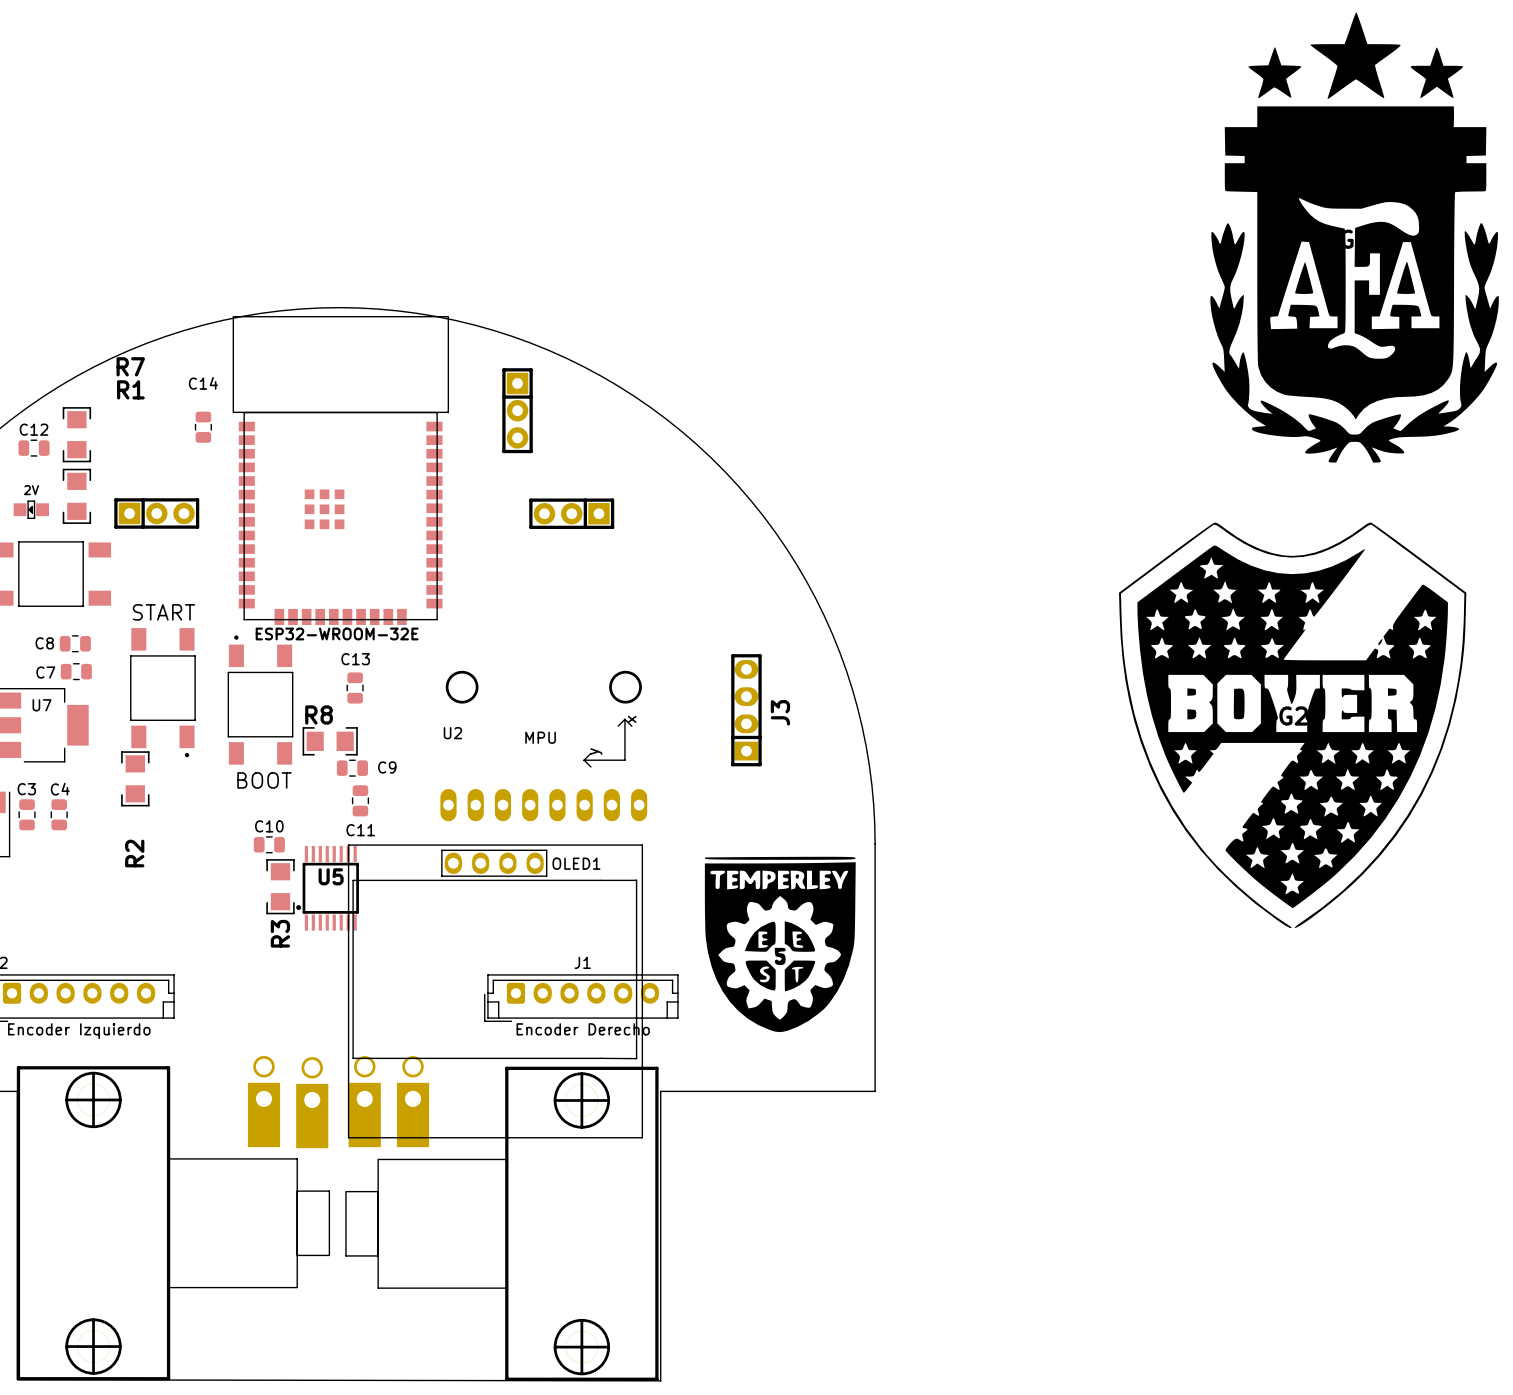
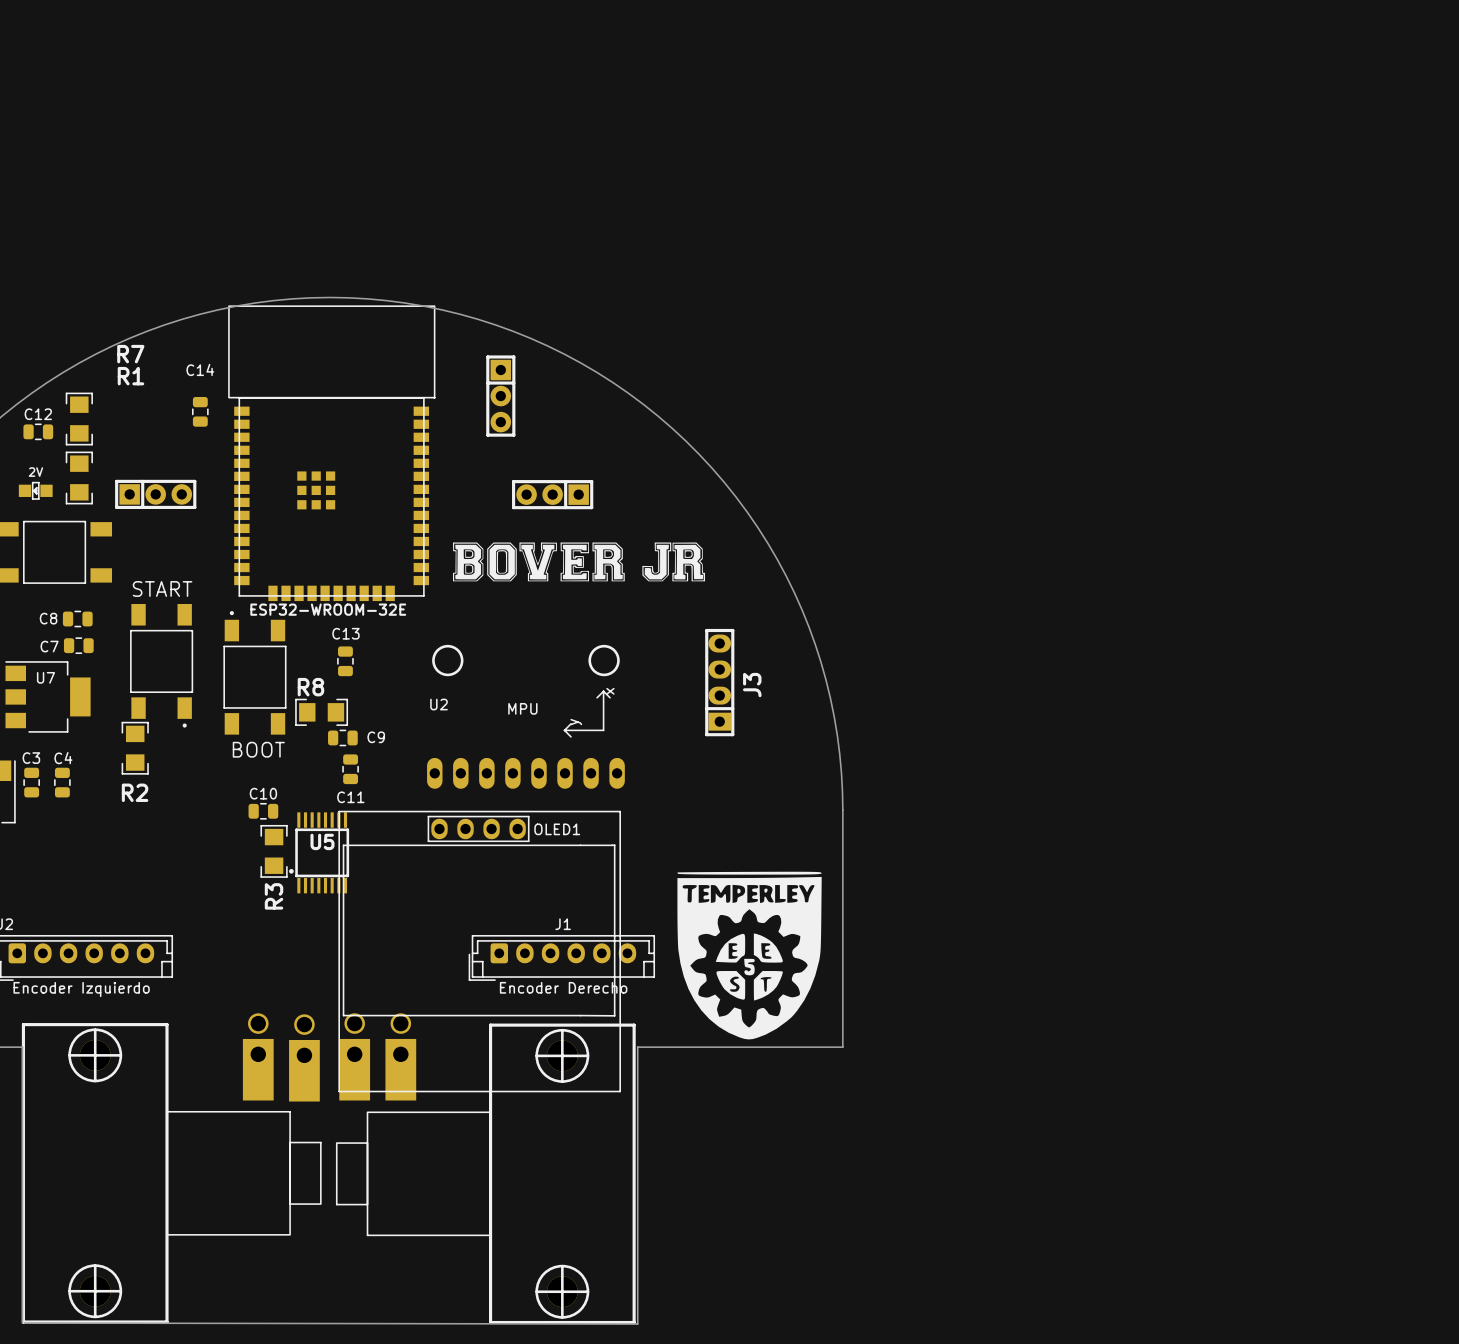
part: (1354, 237) -> none
drawing: none -> [452, 542, 706, 582]
G2: (1292, 725) -> none
R2 name rotation: 0° (134, 853) -> 90° clockwise (135, 792)
drawing position: (780, 944) -> (749, 955)

